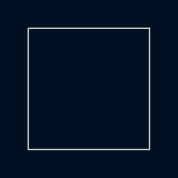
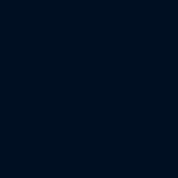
part: (88, 88) -> none

